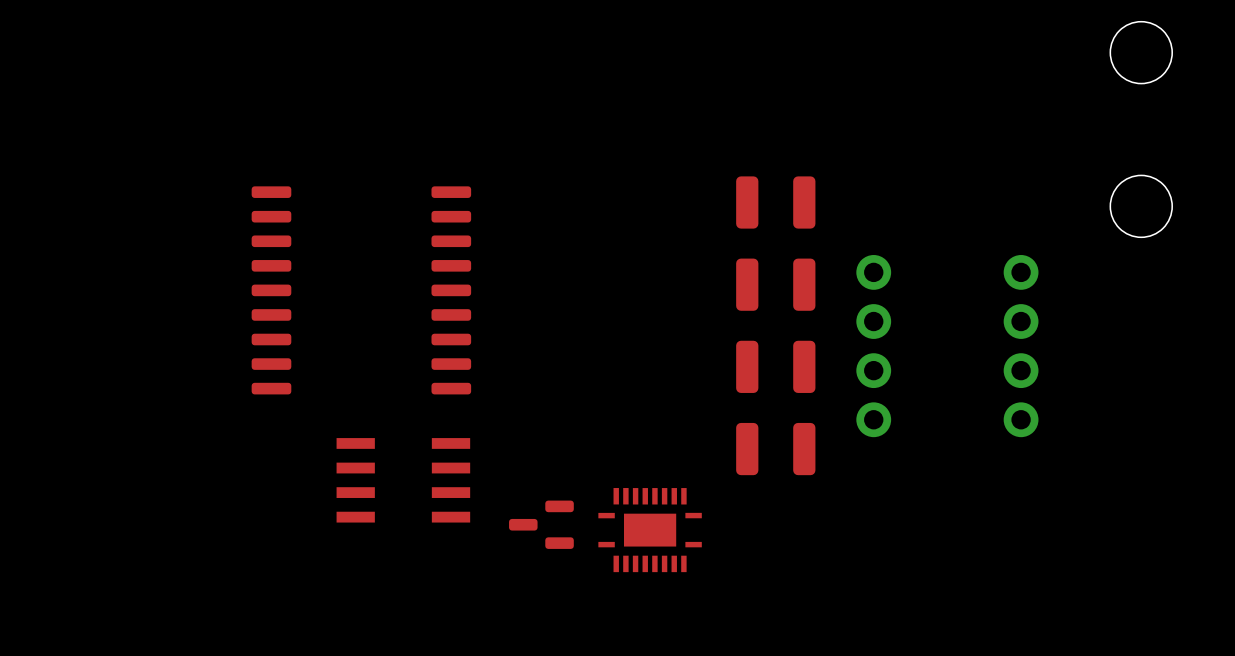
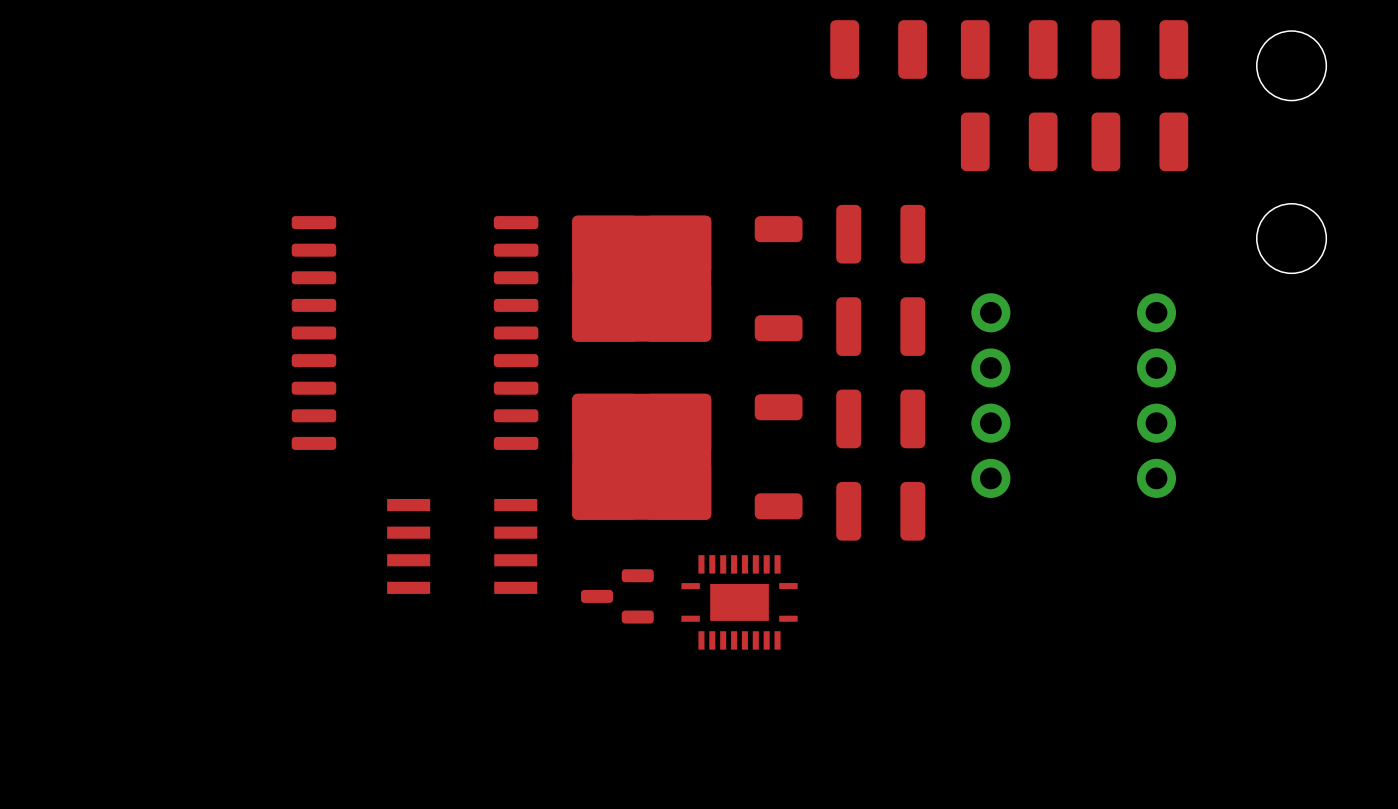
part: none -> (878, 49)
part: none -> (1009, 49)
part: none -> (1139, 49)
part: none -> (1009, 141)
part: none -> (1139, 141)
part: none -> (687, 278)
part: none -> (687, 456)

